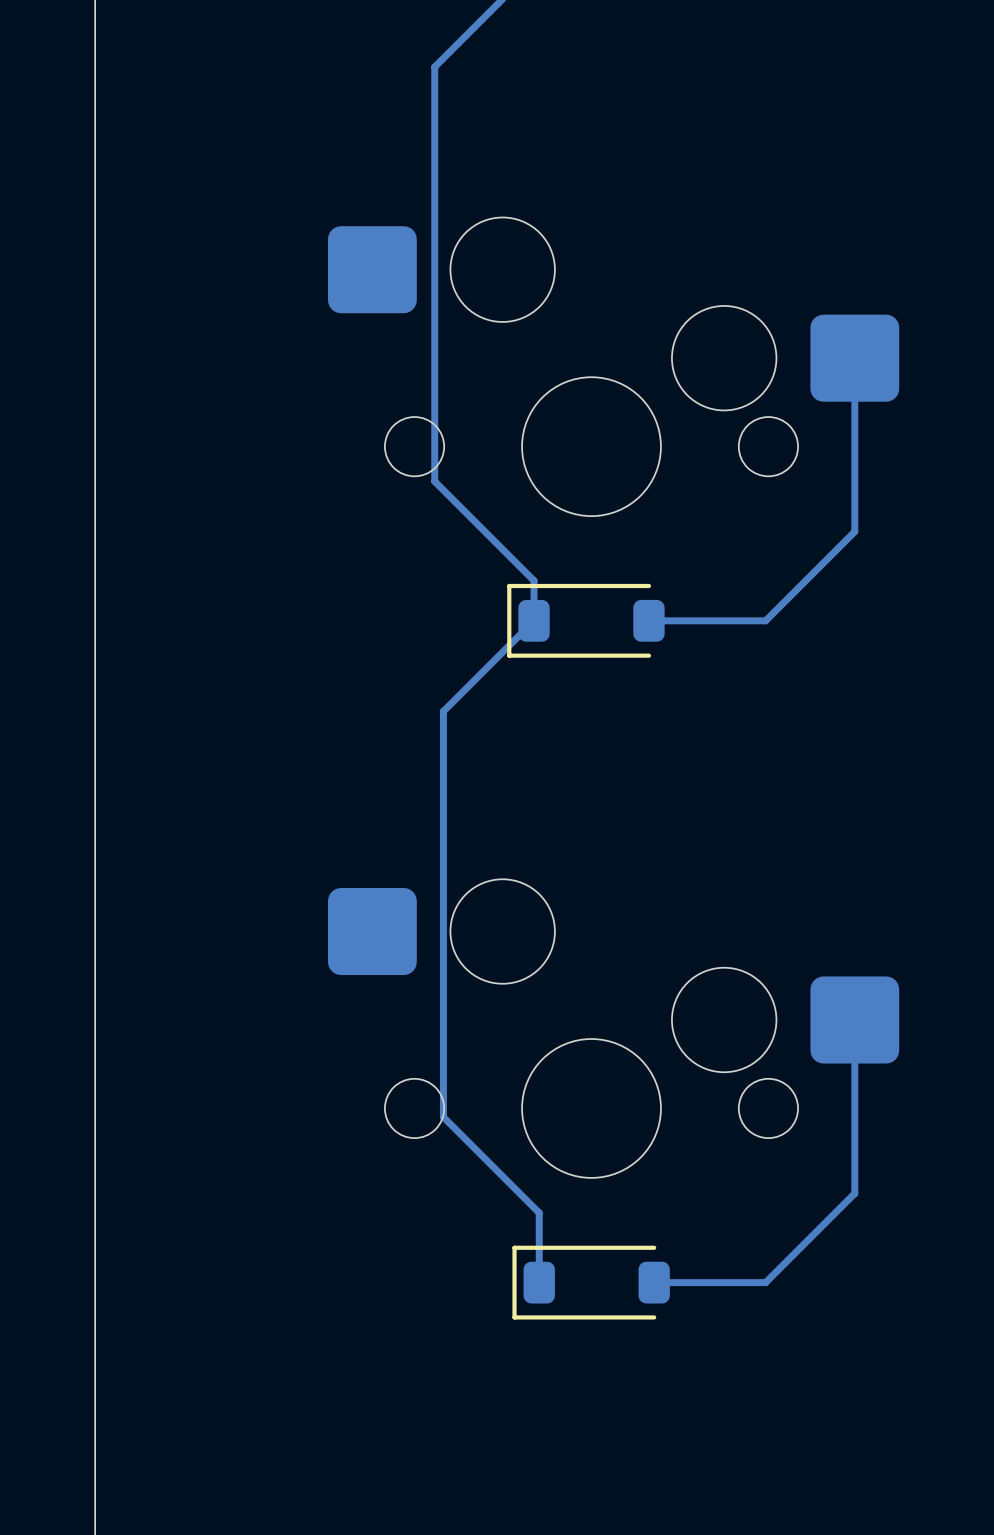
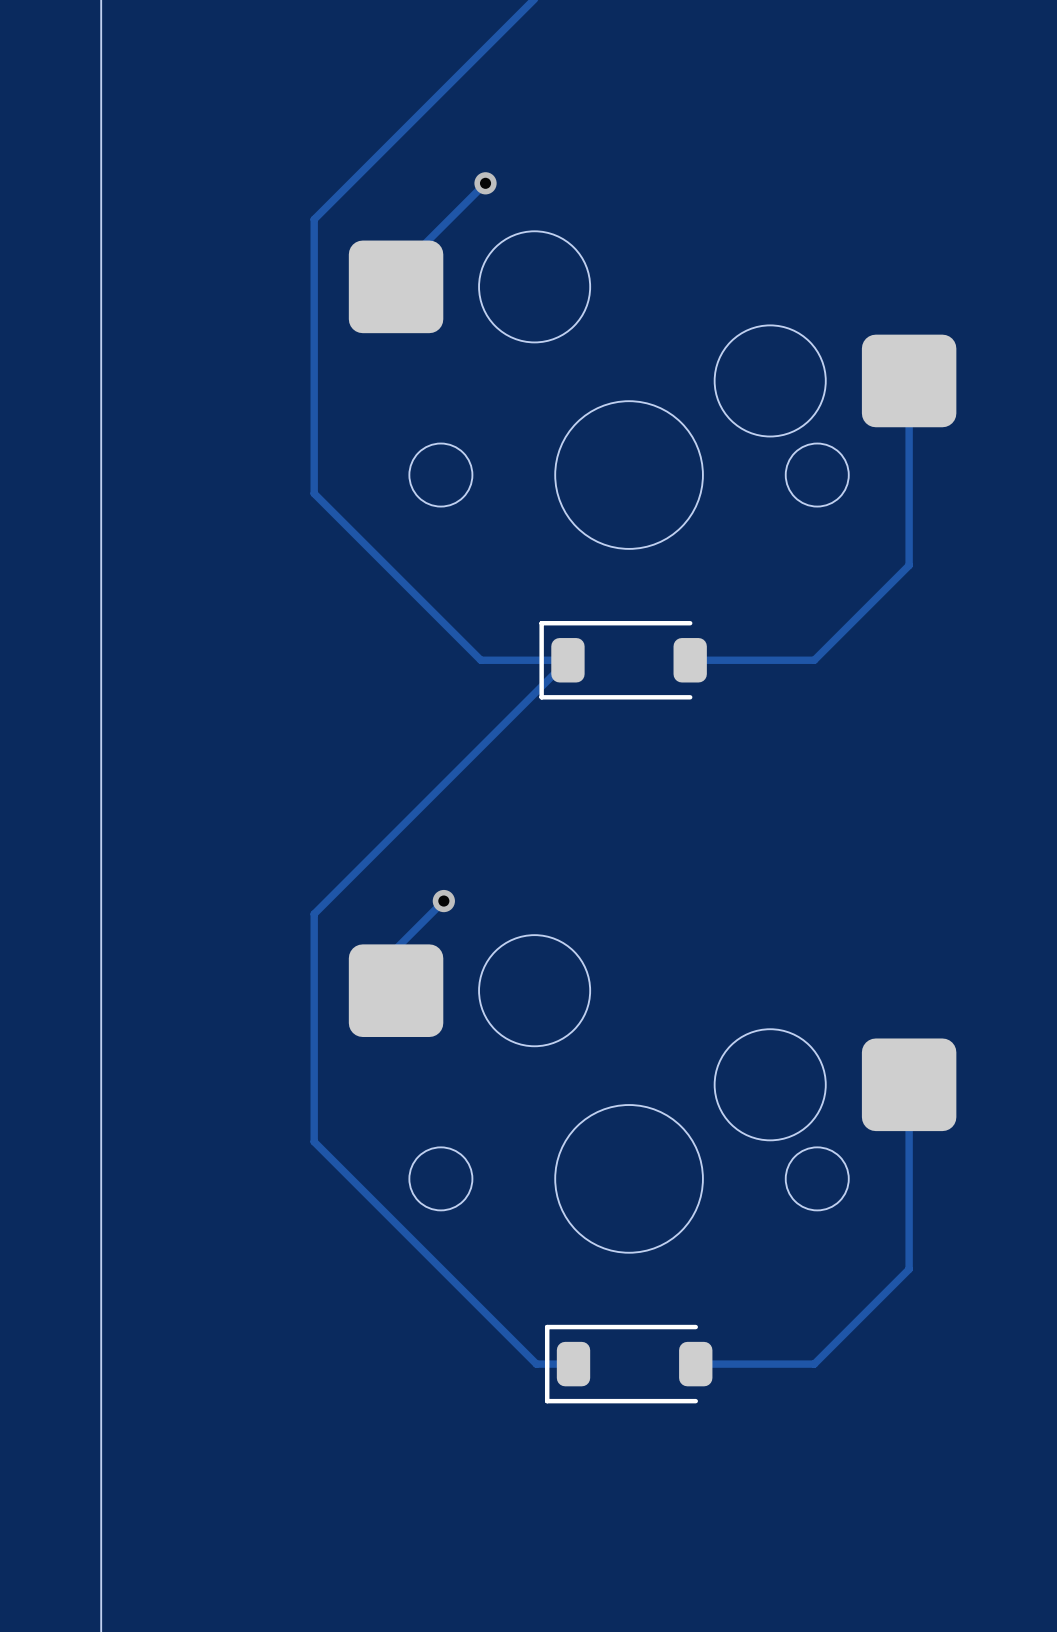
track: (434, 67) (434, 481) (534, 580) (534, 620) -> (462, 71) (314, 219) (314, 493) (480, 660) (567, 660)
track: none -> (485, 183) (396, 272) (396, 286)
via: none -> (485, 183)
track: (443, 711) (443, 1117) (539, 1212) (539, 1282) -> (471, 756) (314, 914) (314, 1141) (536, 1364) (573, 1364)
track: none -> (443, 901) (396, 948) (396, 990)
via: none -> (443, 901)

